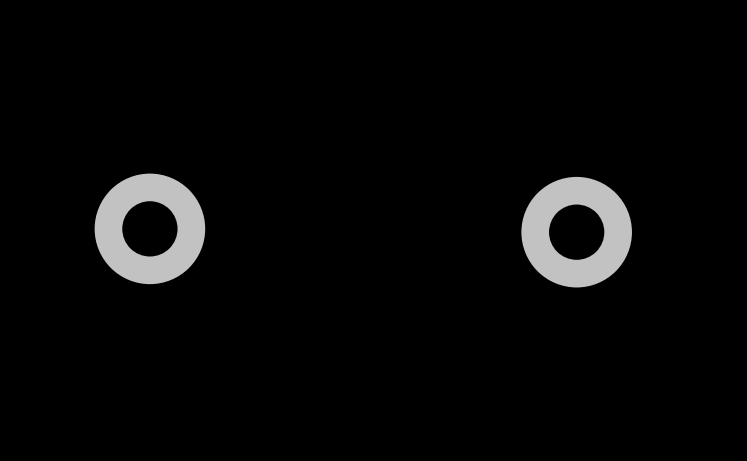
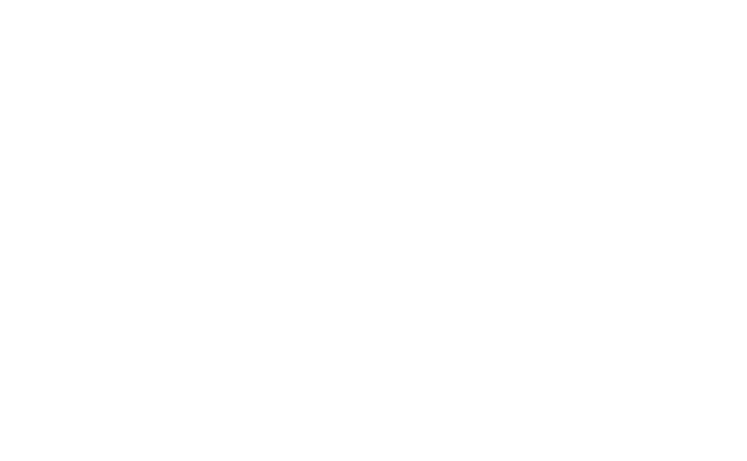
via: (149, 228) -> none
via: (576, 232) -> none

